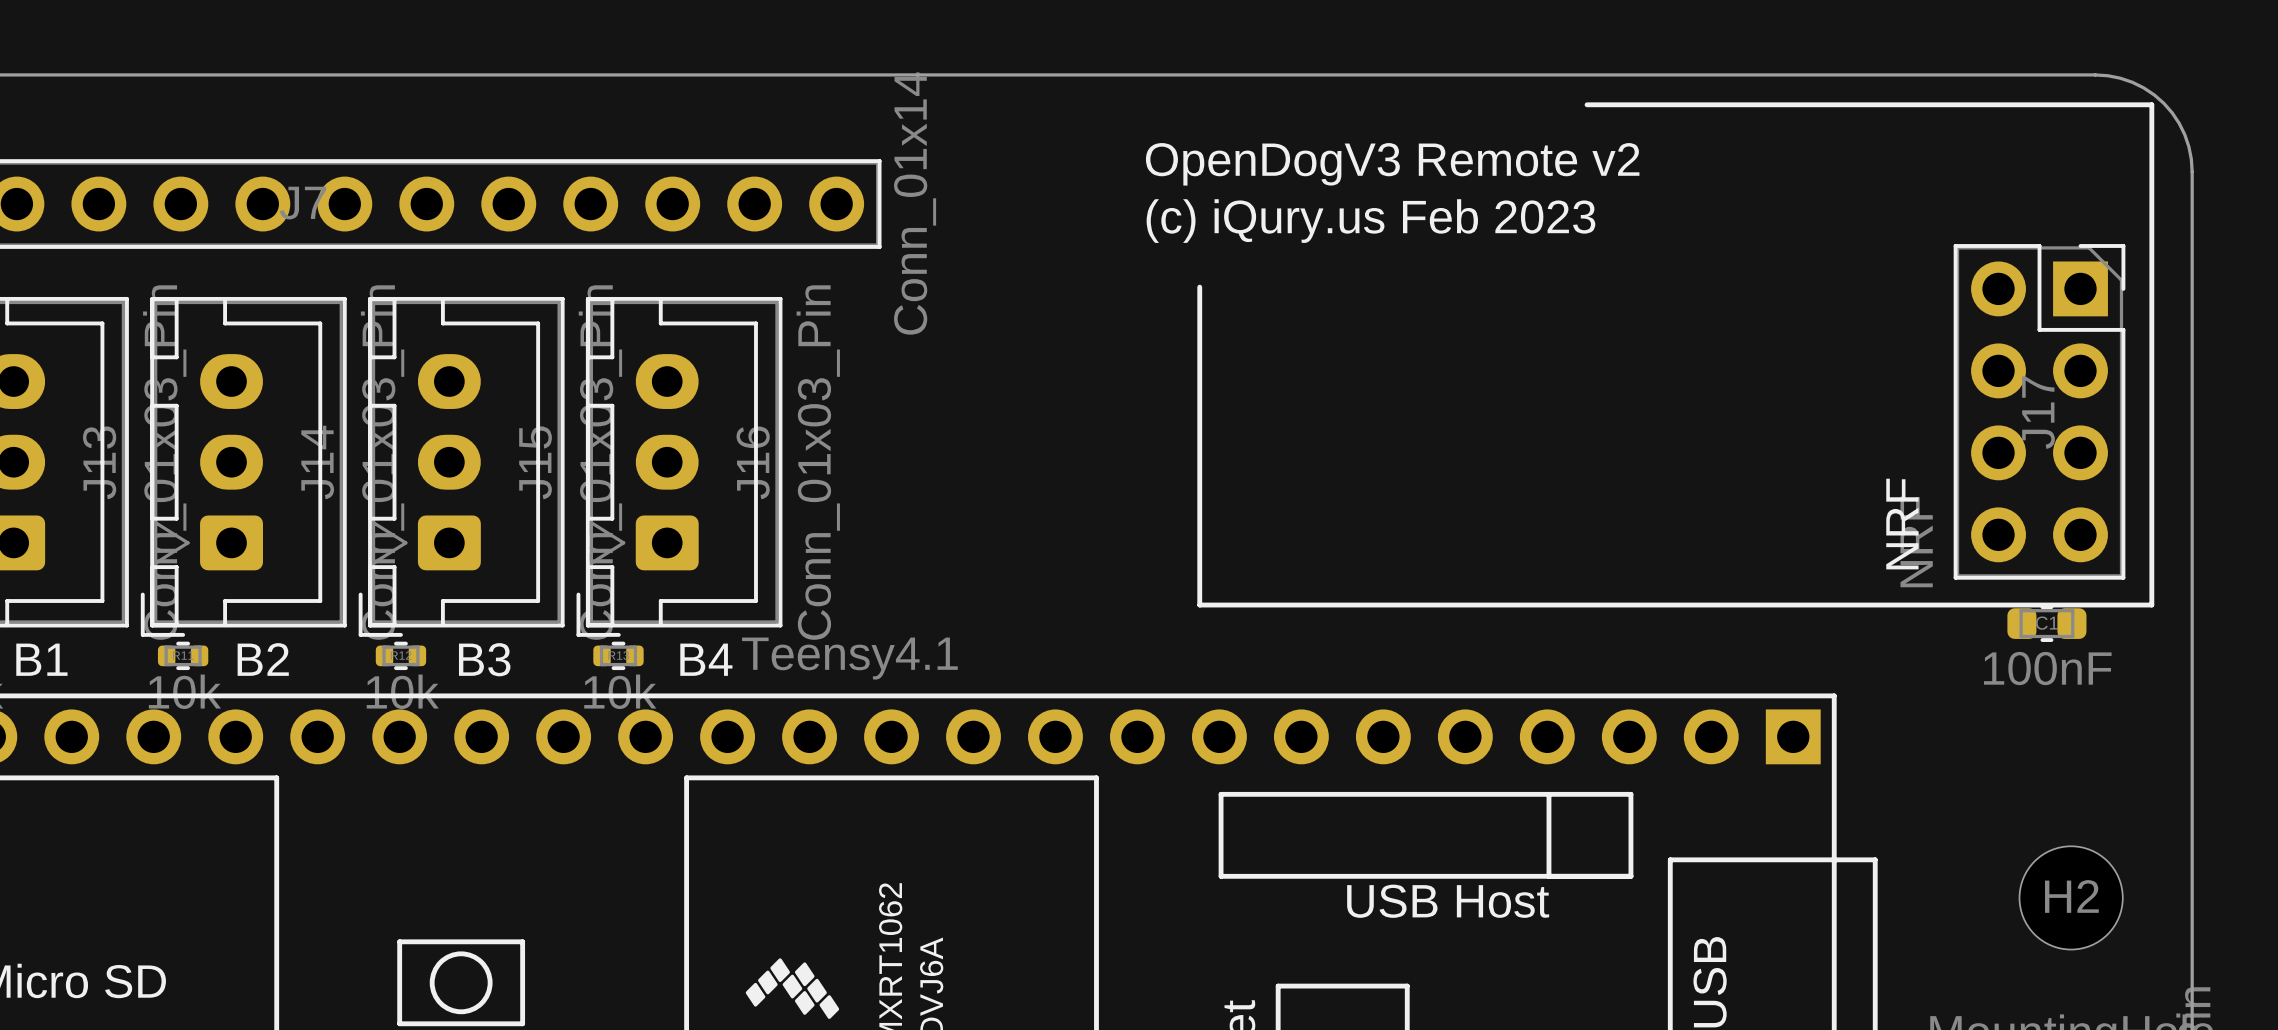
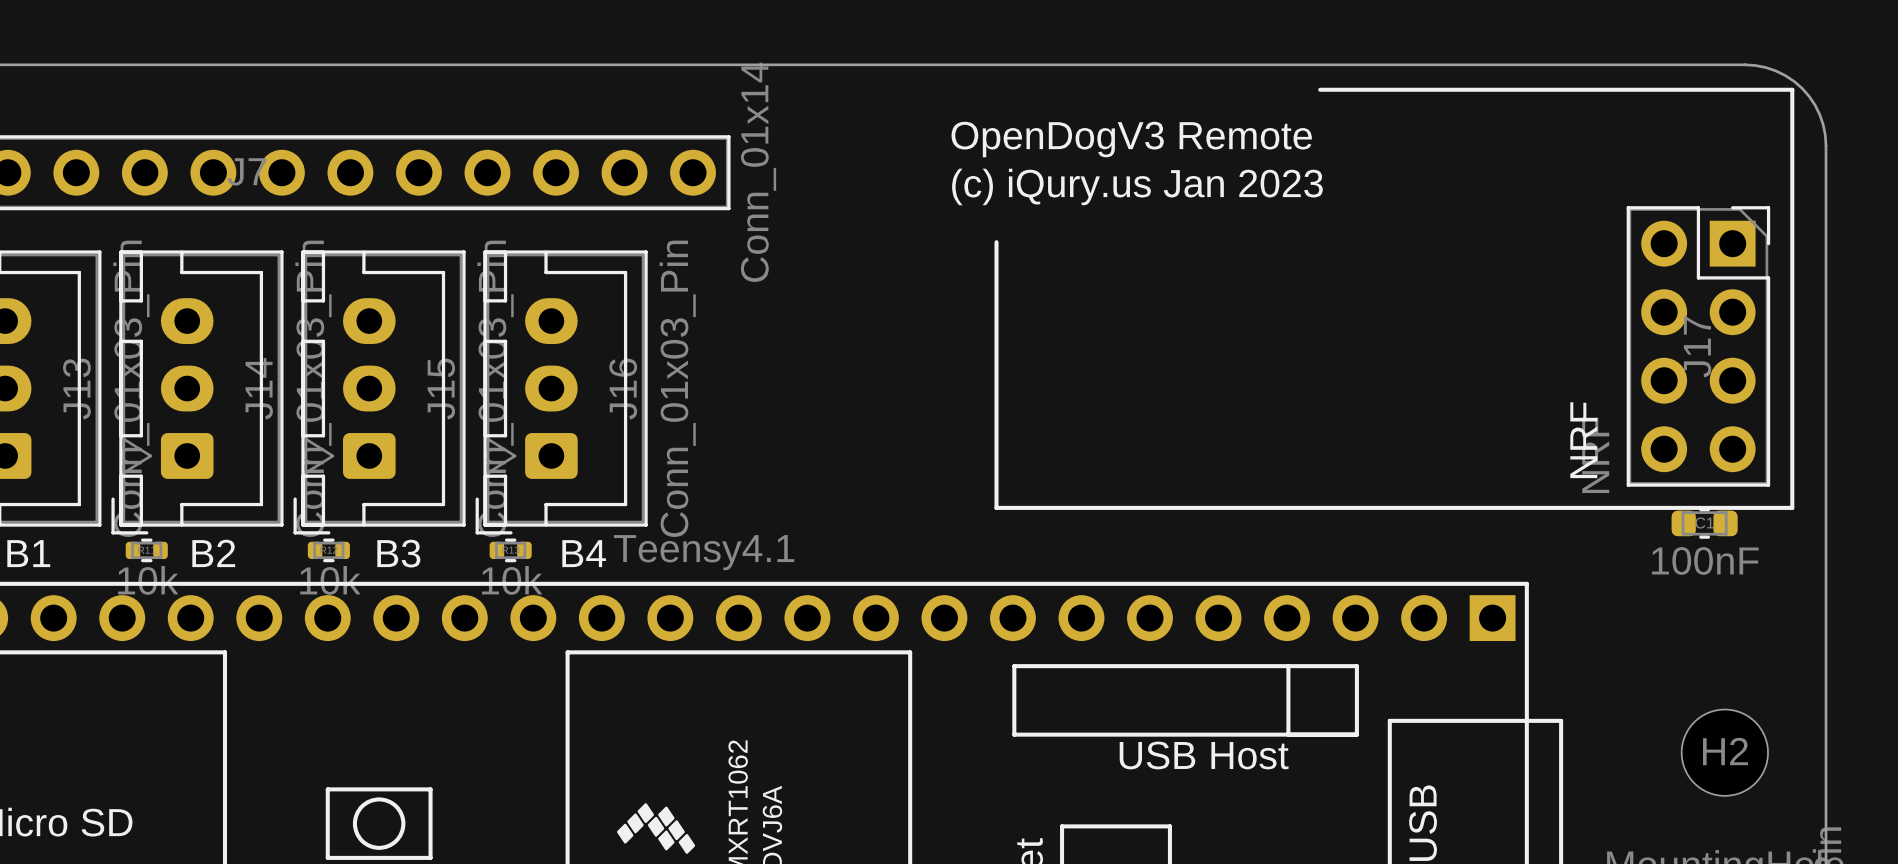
text: OpenDogV3 Remote v2 (1392, 164) -> OpenDogV3 Remote (1131, 139)
text: (c) iQury.us Feb 2023 (1370, 221) -> (c) iQury.us Jan 2023 (1137, 186)

